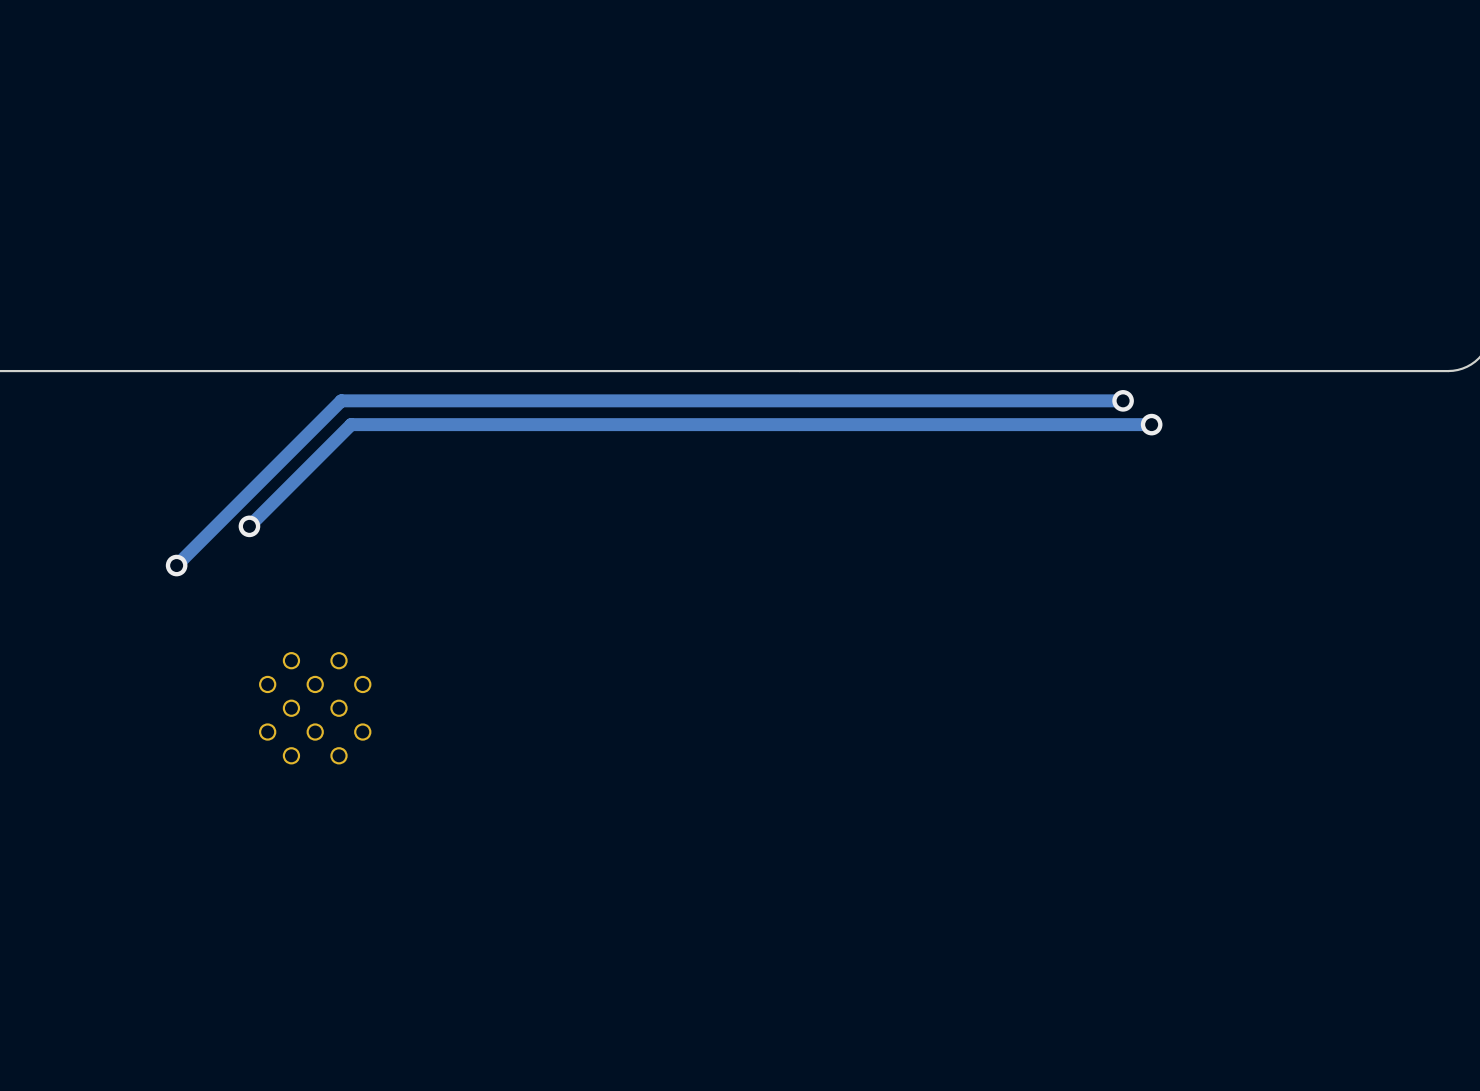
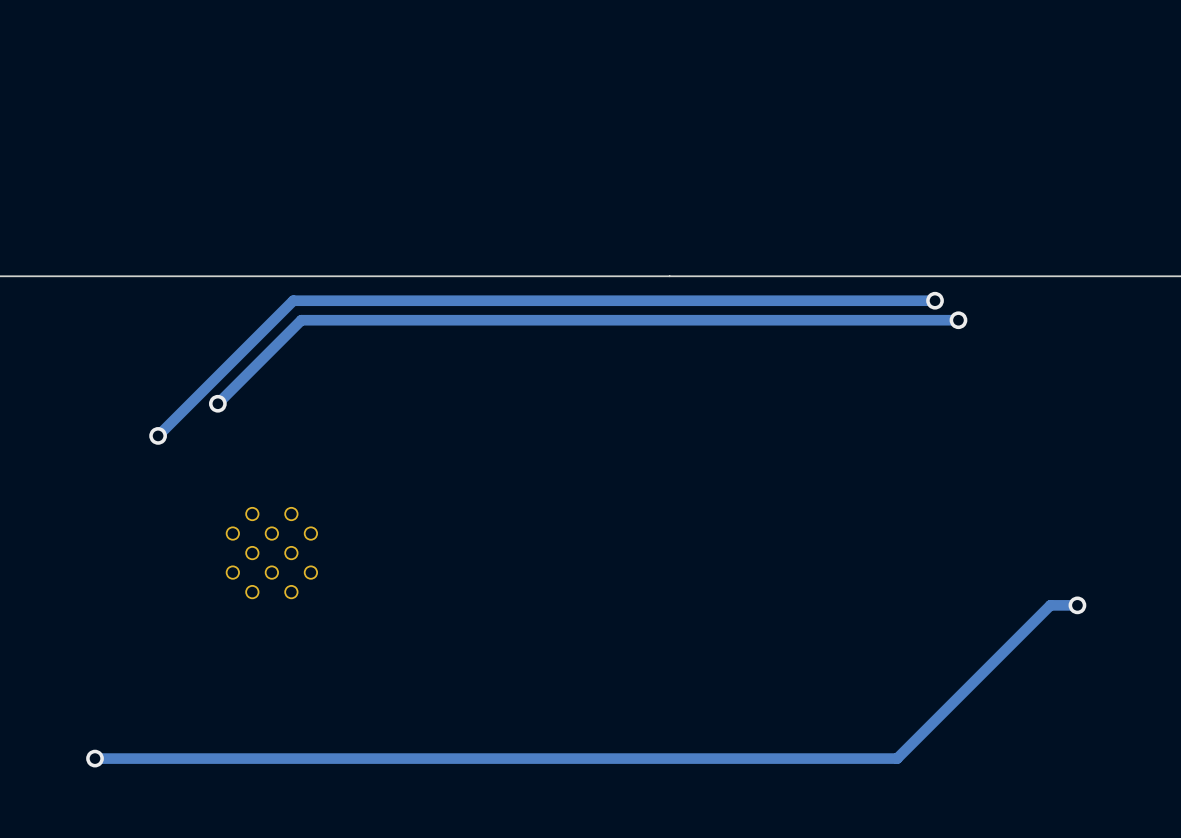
track: none -> (1077, 605) (1050, 605) (897, 758) (95, 758)
via: none -> (1077, 605)
via: none -> (95, 758)

